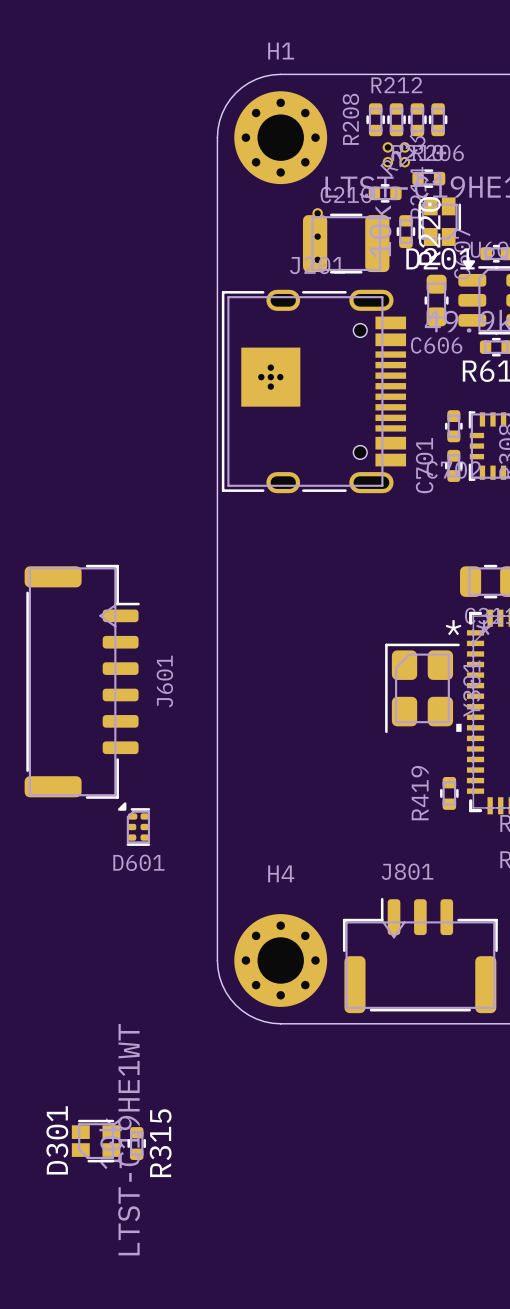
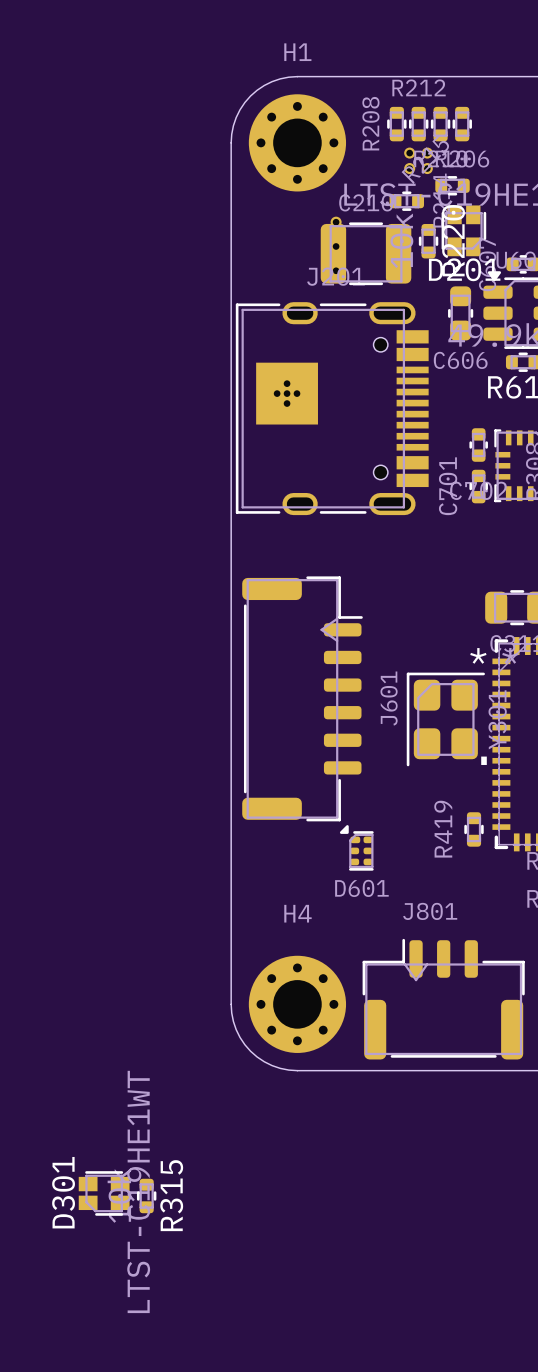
J601 position: (82, 681) -> (302, 698)
D601 position: (134, 824) -> (356, 847)

